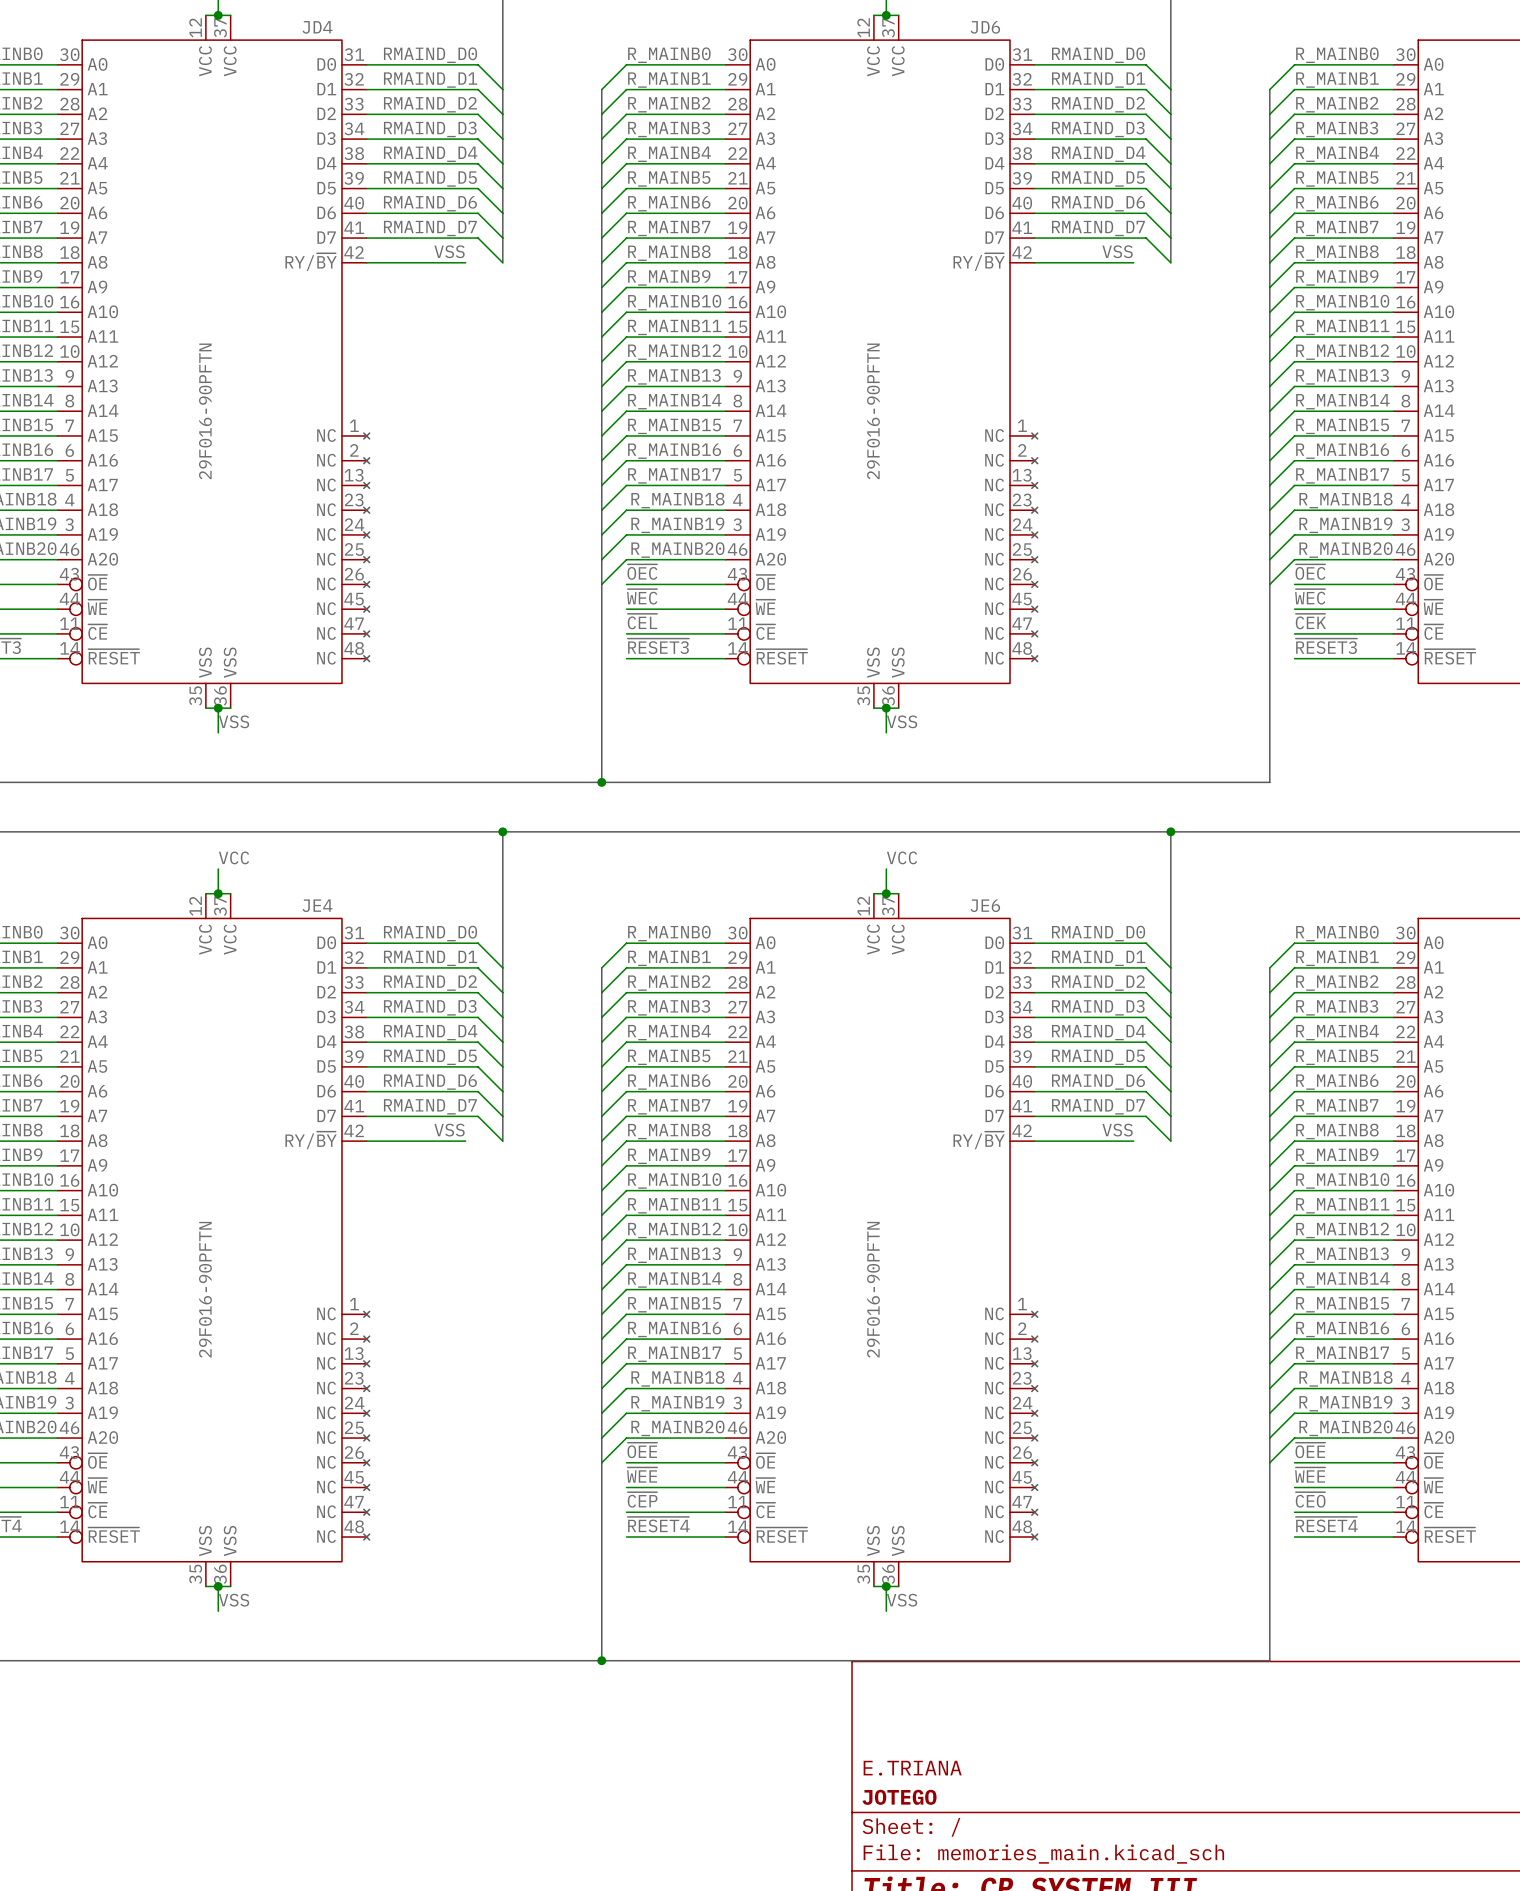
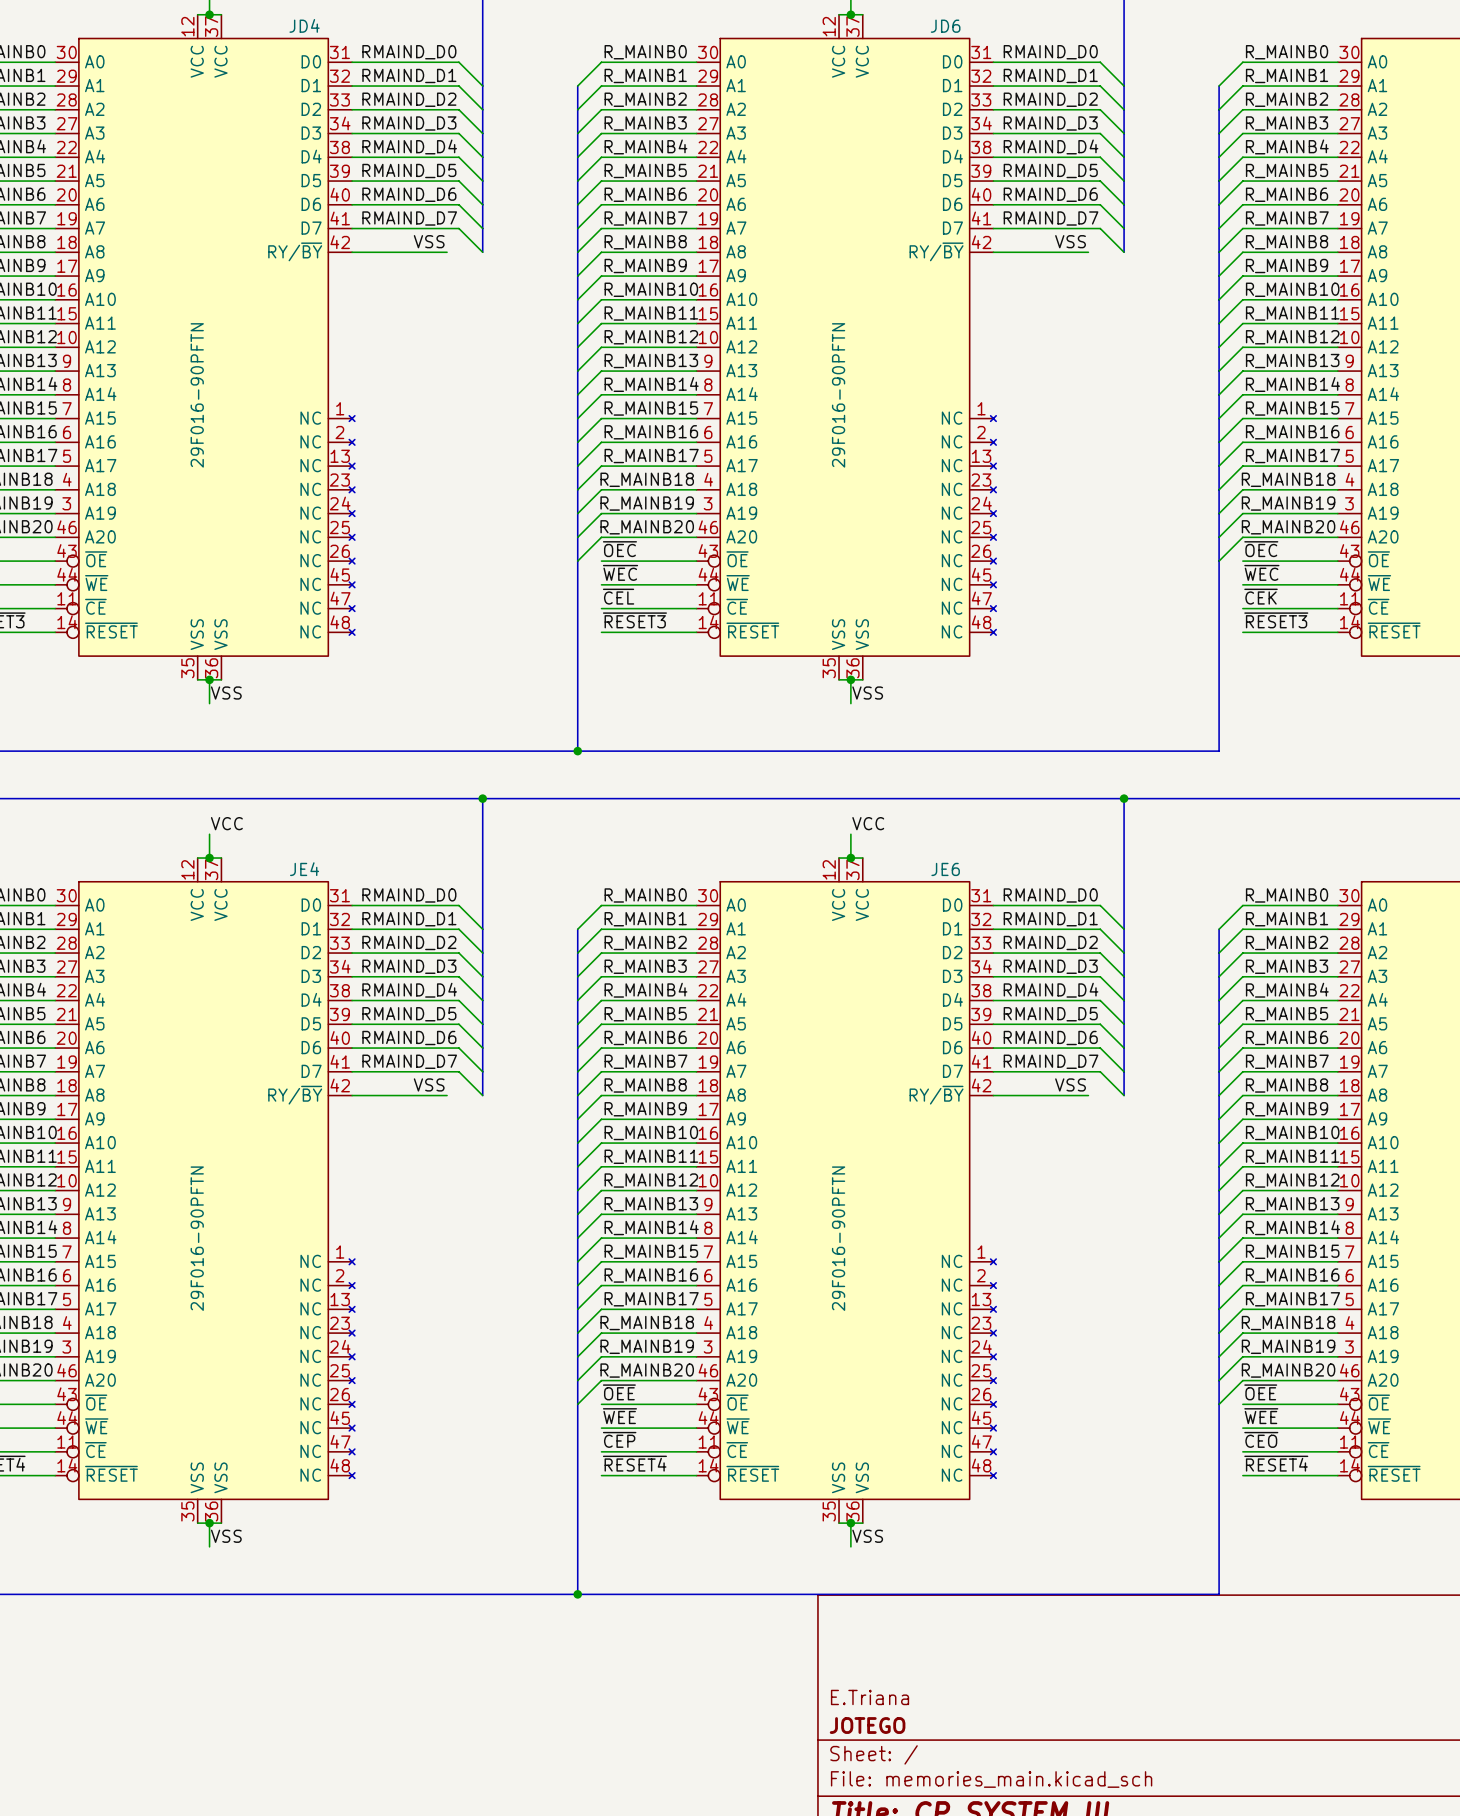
title block: E.TRIANA (912, 1768) -> E.Triana (870, 1697)

